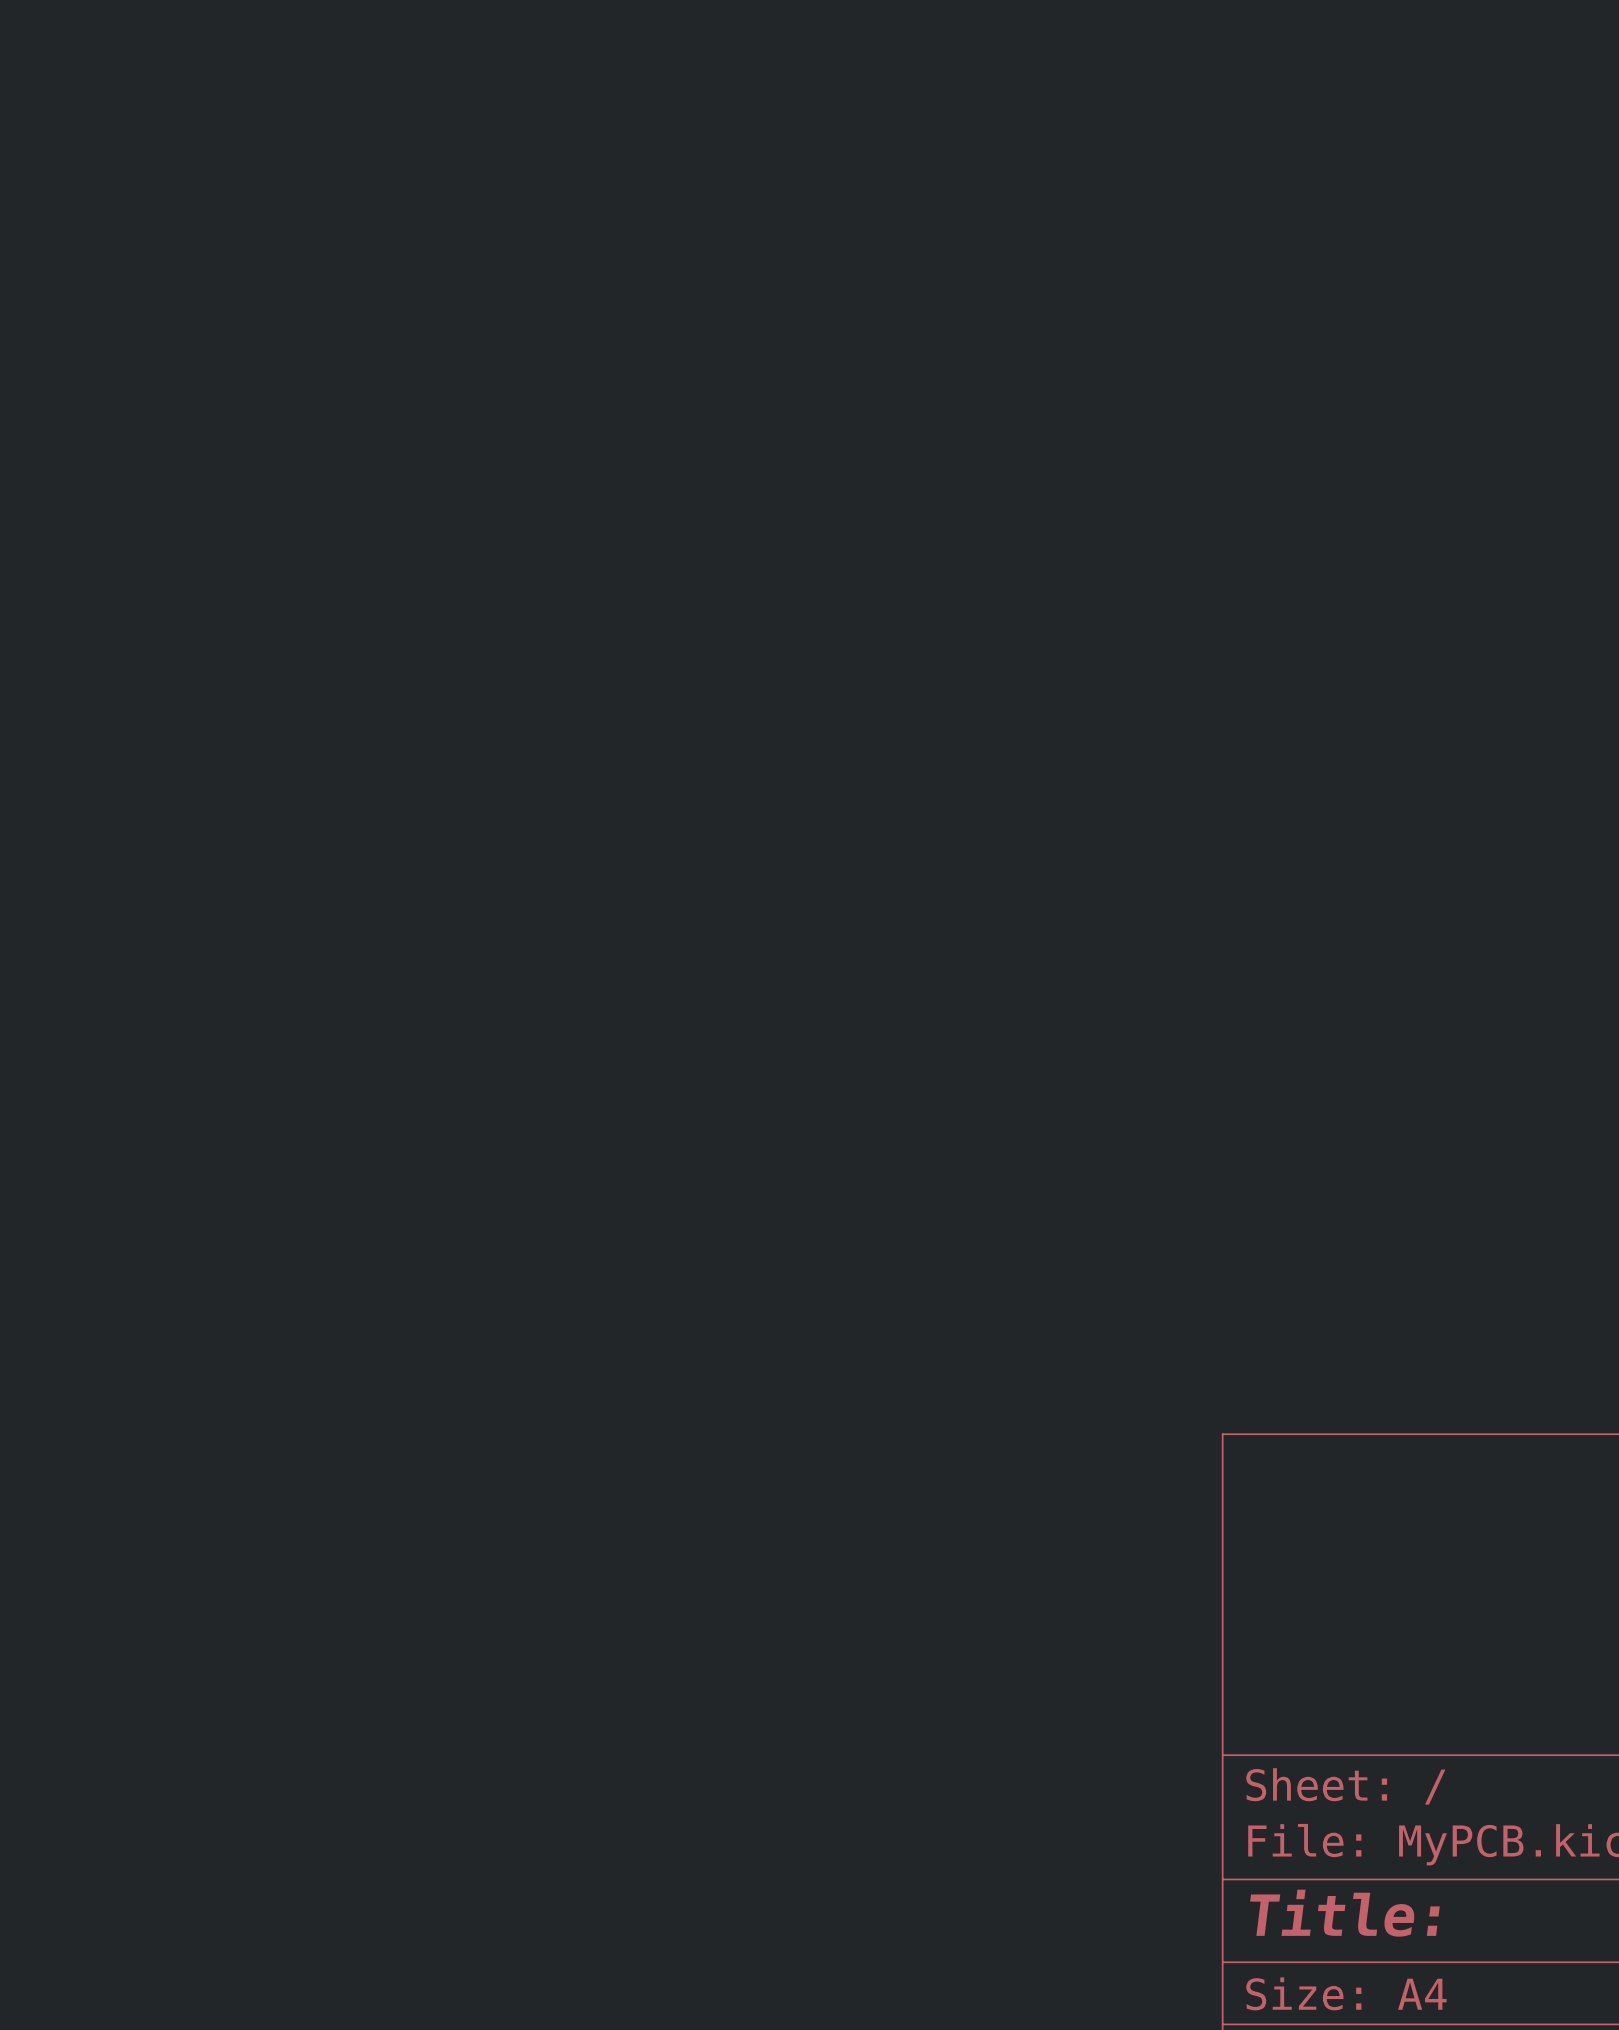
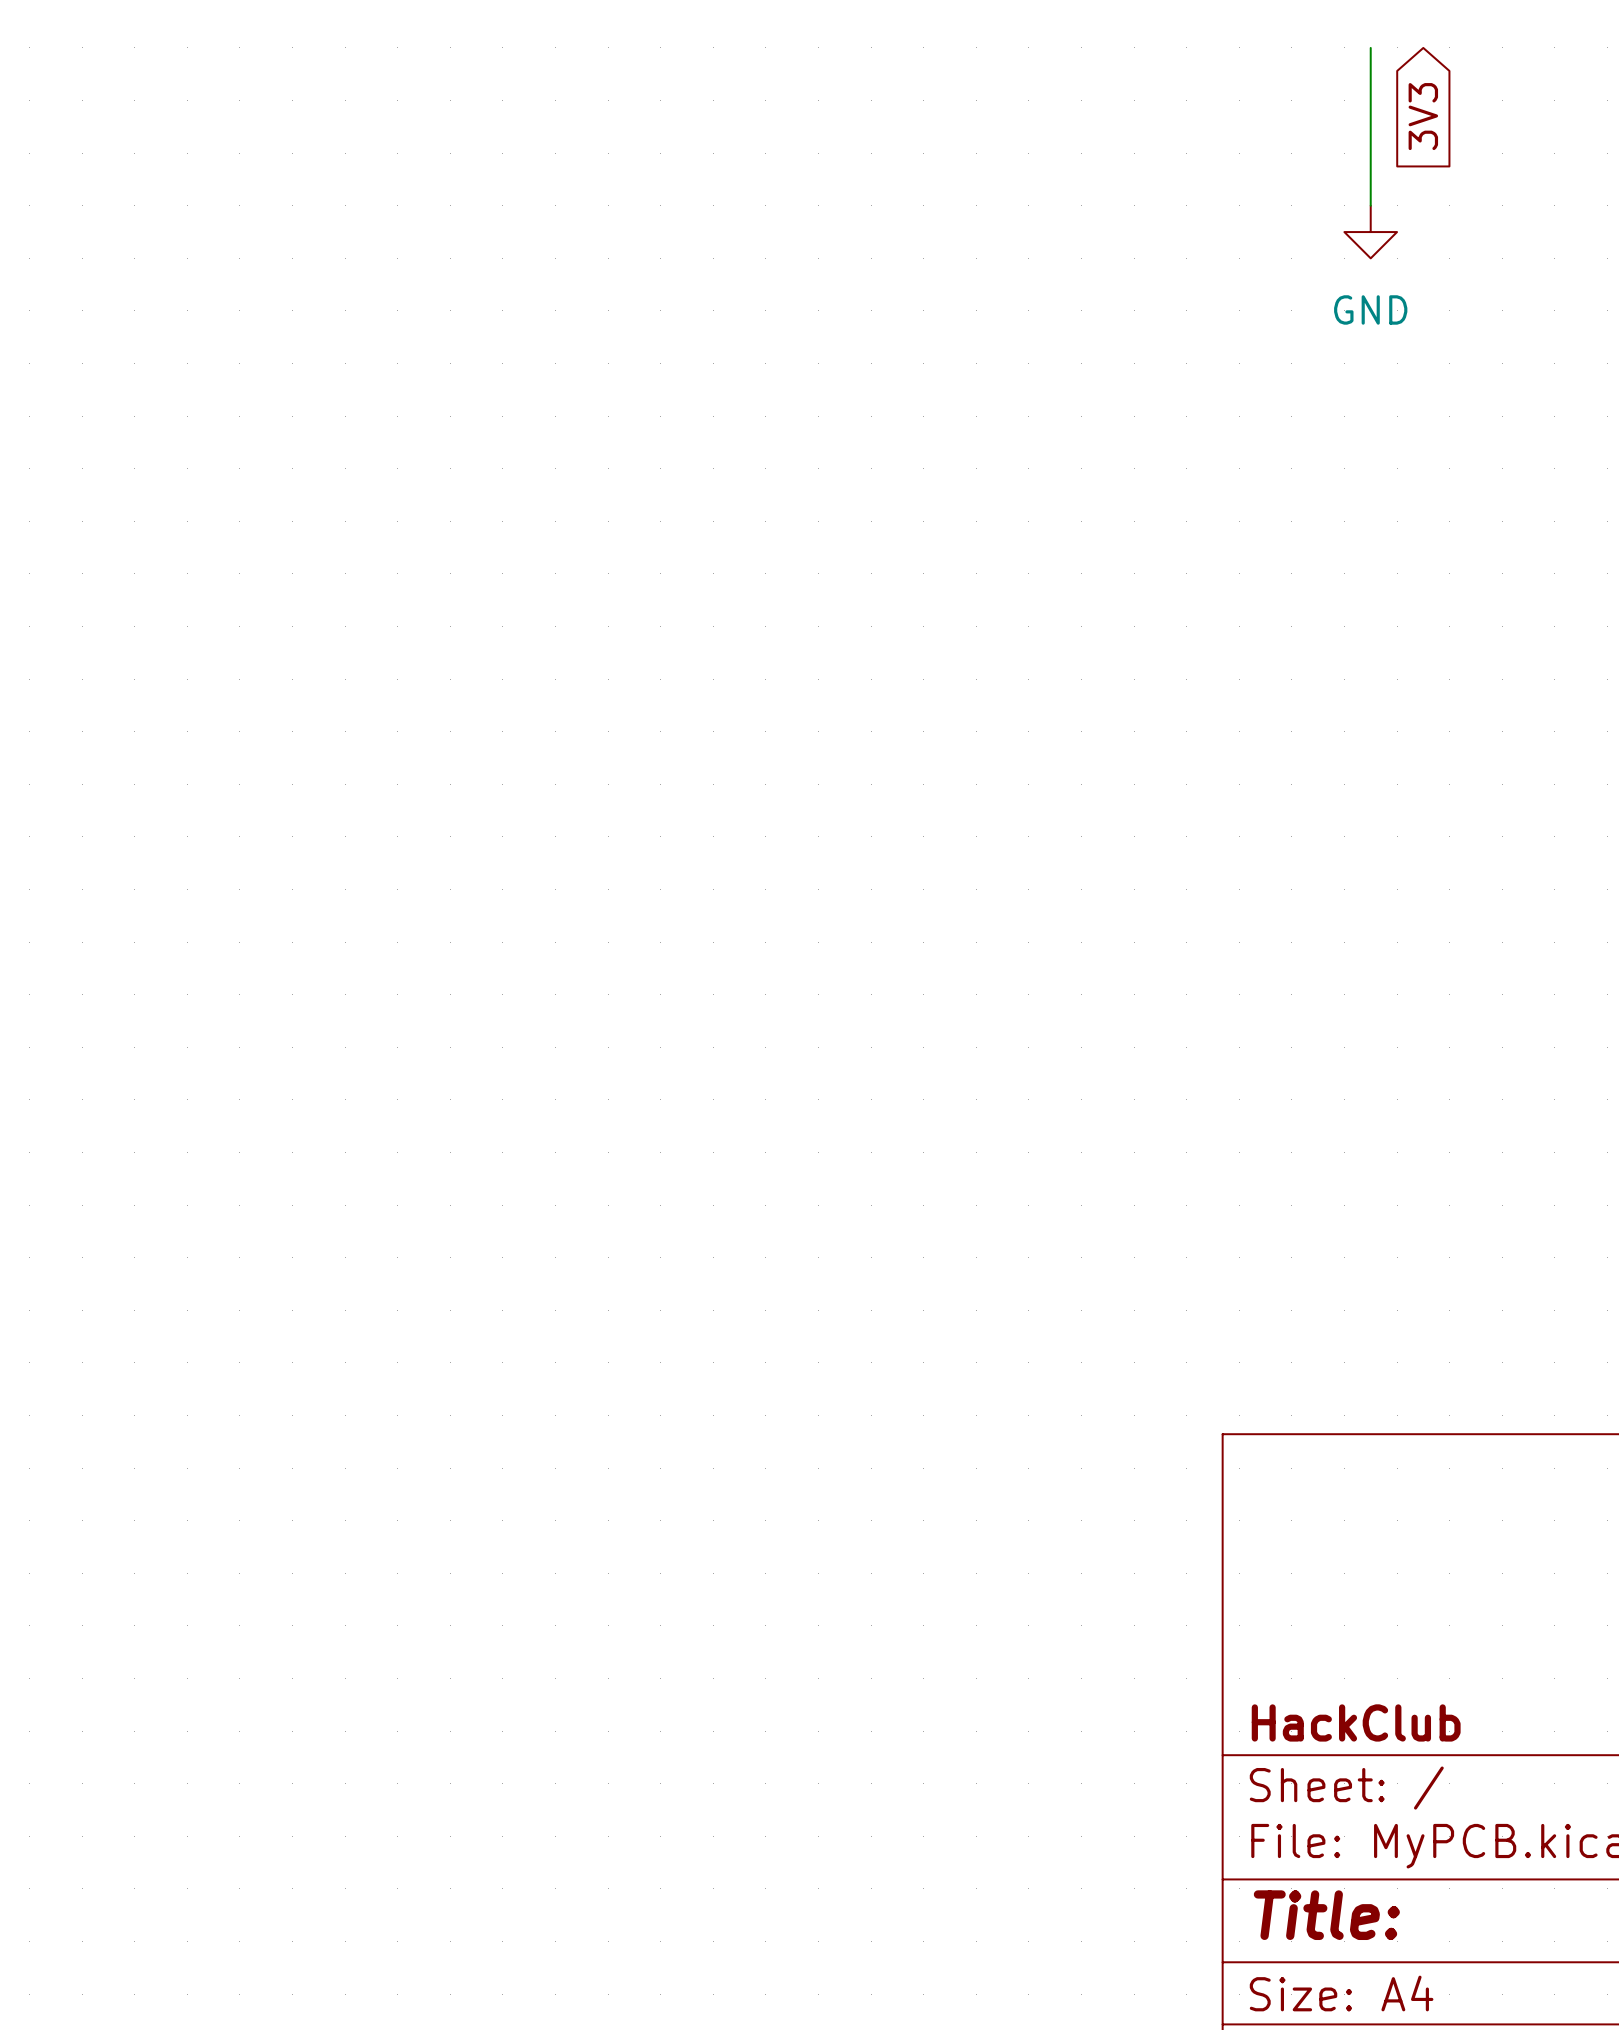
wire: none -> (1370, 47) (1370, 205)
global label: none -> 3V3 (1423, 116)
power symbol: none -> GND (1370, 232)
title block: none -> HackClub (1356, 1722)

